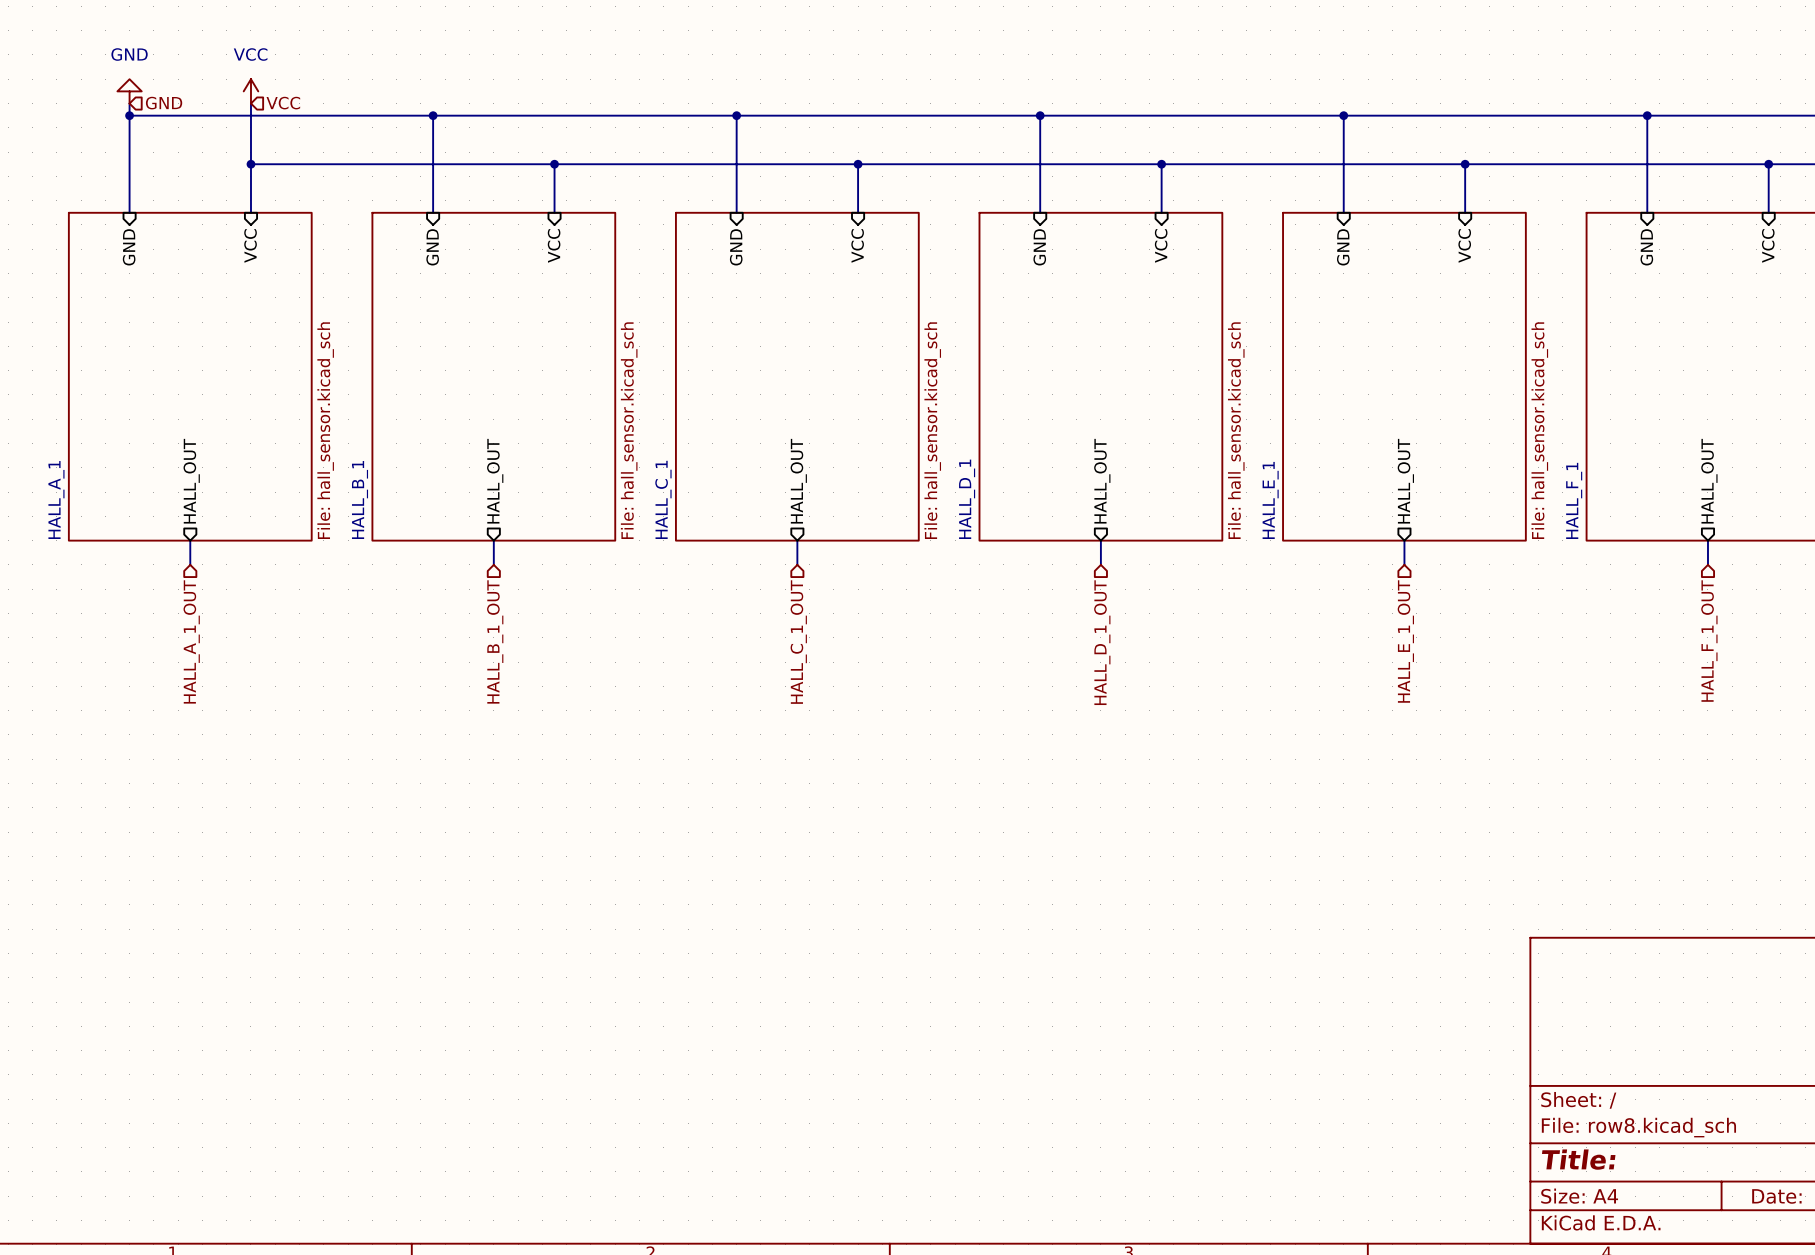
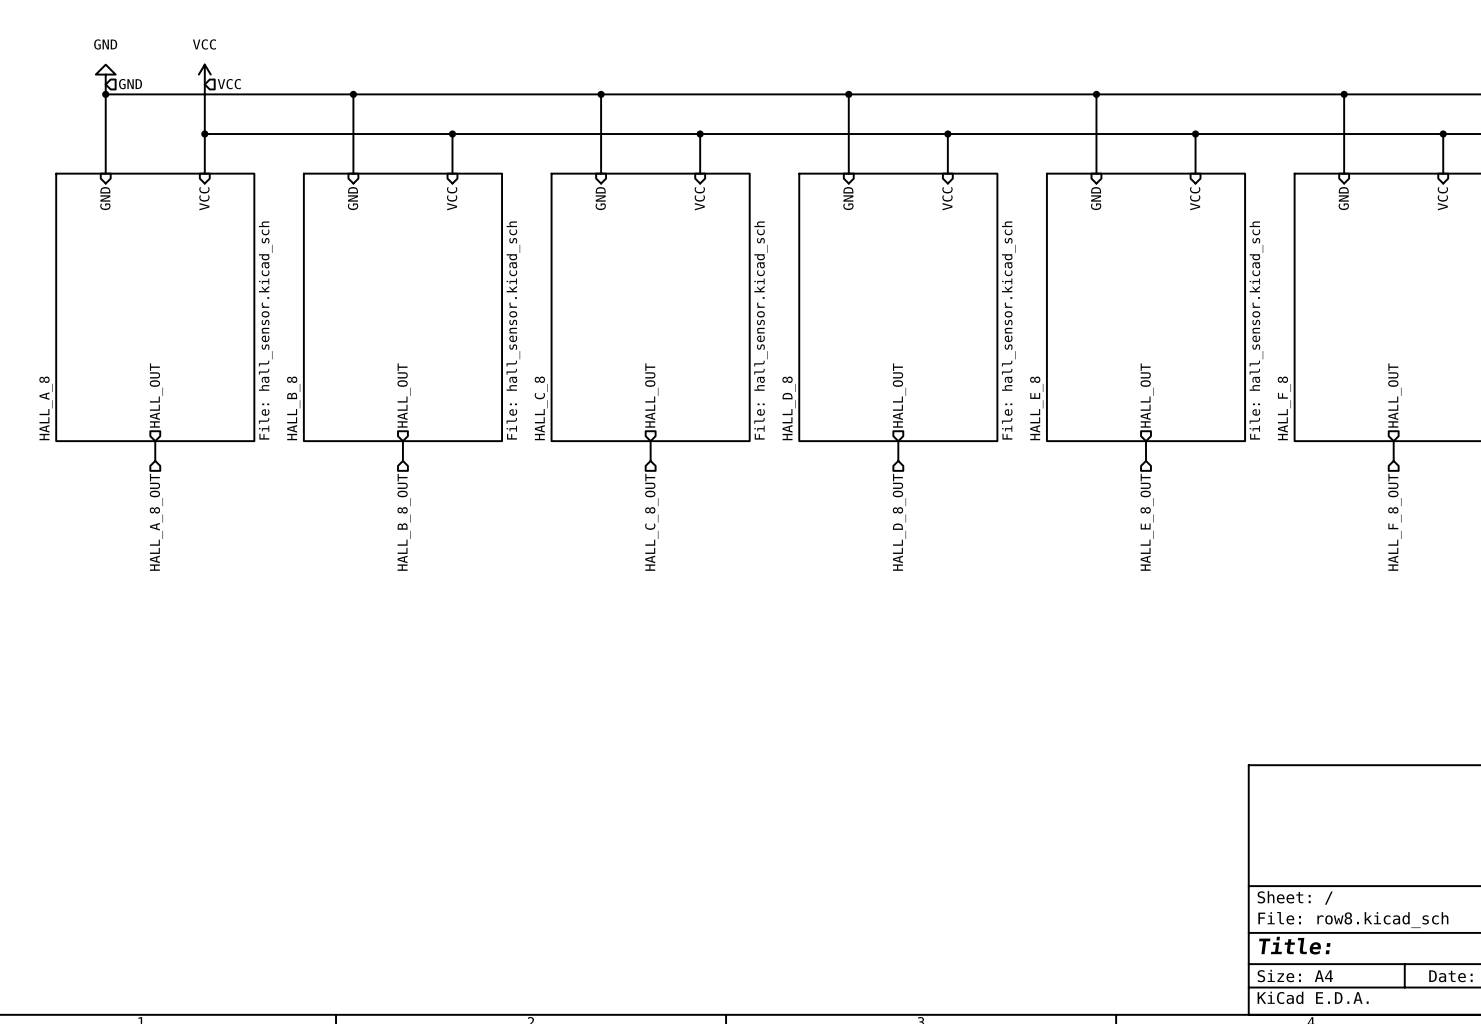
sheet HALL_C_1 name: HALL_C_1 (663, 499) -> HALL_C_8 (541, 408)
sheet HALL_D_1 name: HALL_D_1 (967, 499) -> HALL_D_8 (789, 408)
sheet HALL_A_1 name: HALL_A_1 (56, 500) -> HALL_A_8 (45, 408)
sheet HALL_B_1 name: HALL_B_1 (360, 500) -> HALL_B_8 (293, 408)
sheet HALL_E_1 name: HALL_E_1 (1270, 500) -> HALL_E_8 (1036, 408)
sheet HALL_F_1 name: HALL_F_1 (1574, 500) -> HALL_F_8 (1284, 408)
hierarchical label: HALL_A_1_OUT (191, 641) -> HALL_A_8_OUT (156, 522)
hierarchical label: HALL_B_1_OUT (495, 641) -> HALL_B_8_OUT (404, 522)
hierarchical label: HALL_E_1_OUT (1405, 641) -> HALL_E_8_OUT (1147, 522)
hierarchical label: HALL_F_1_OUT (1709, 641) -> HALL_F_8_OUT (1394, 522)
hierarchical label: HALL_C_1_OUT (798, 642) -> HALL_C_8_OUT (651, 522)
hierarchical label: HALL_D_1_OUT (1102, 642) -> HALL_D_8_OUT (899, 522)

